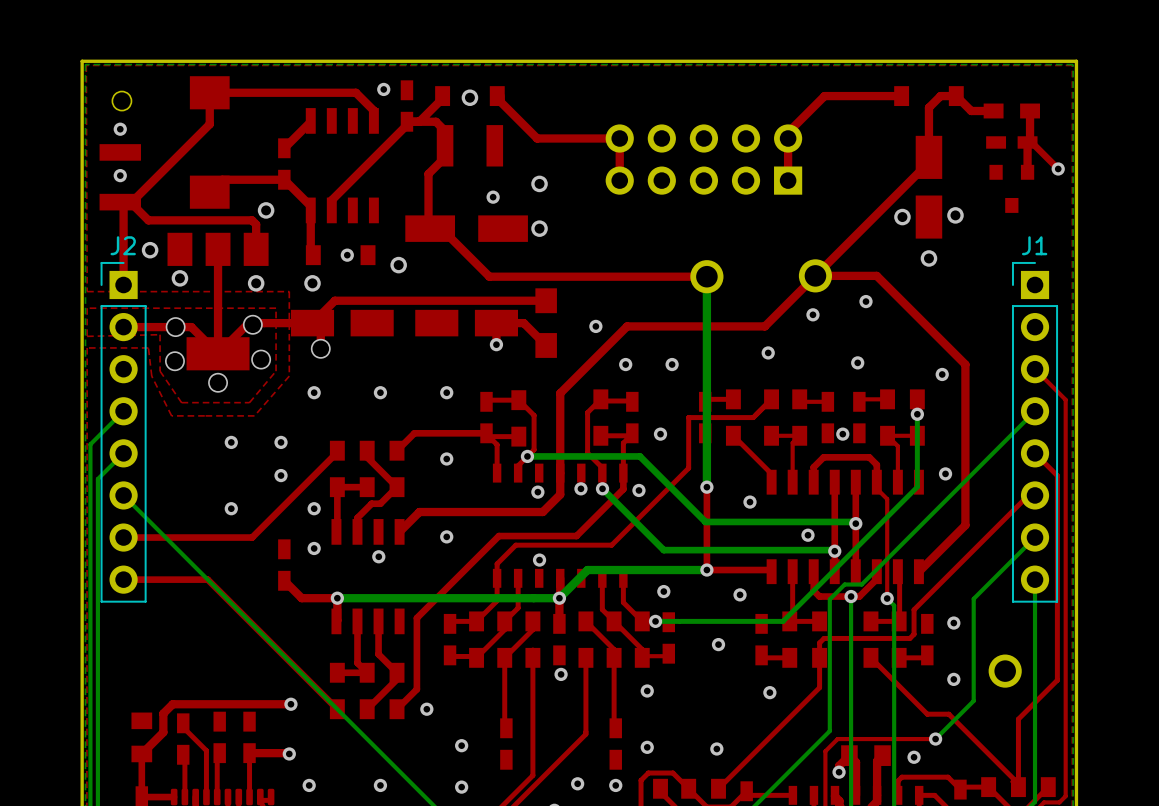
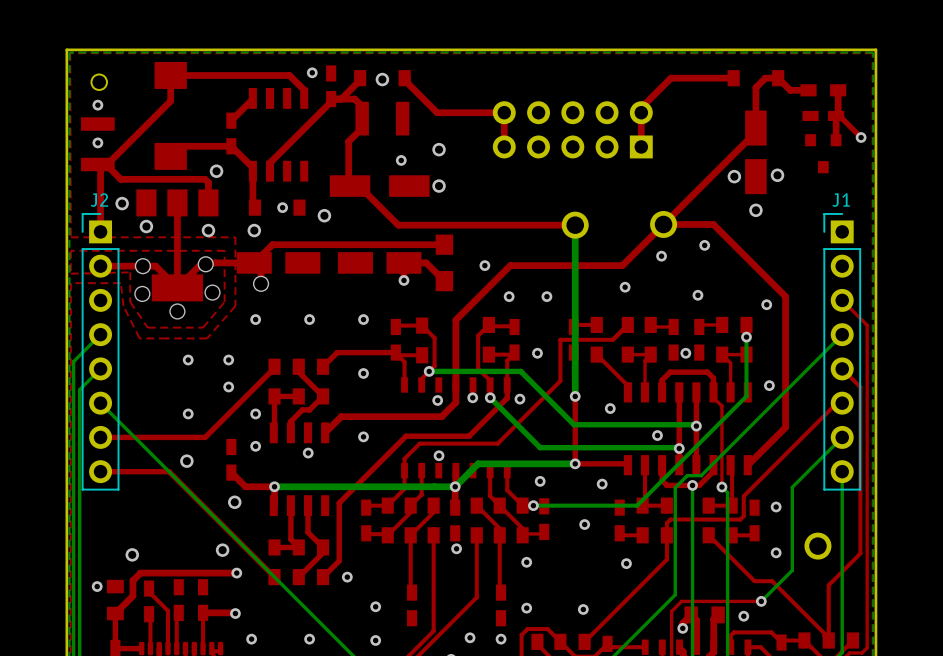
via: none -> (186, 461)
via: none -> (234, 502)
via: none -> (222, 550)
via: none -> (132, 554)
via: none -> (97, 586)

